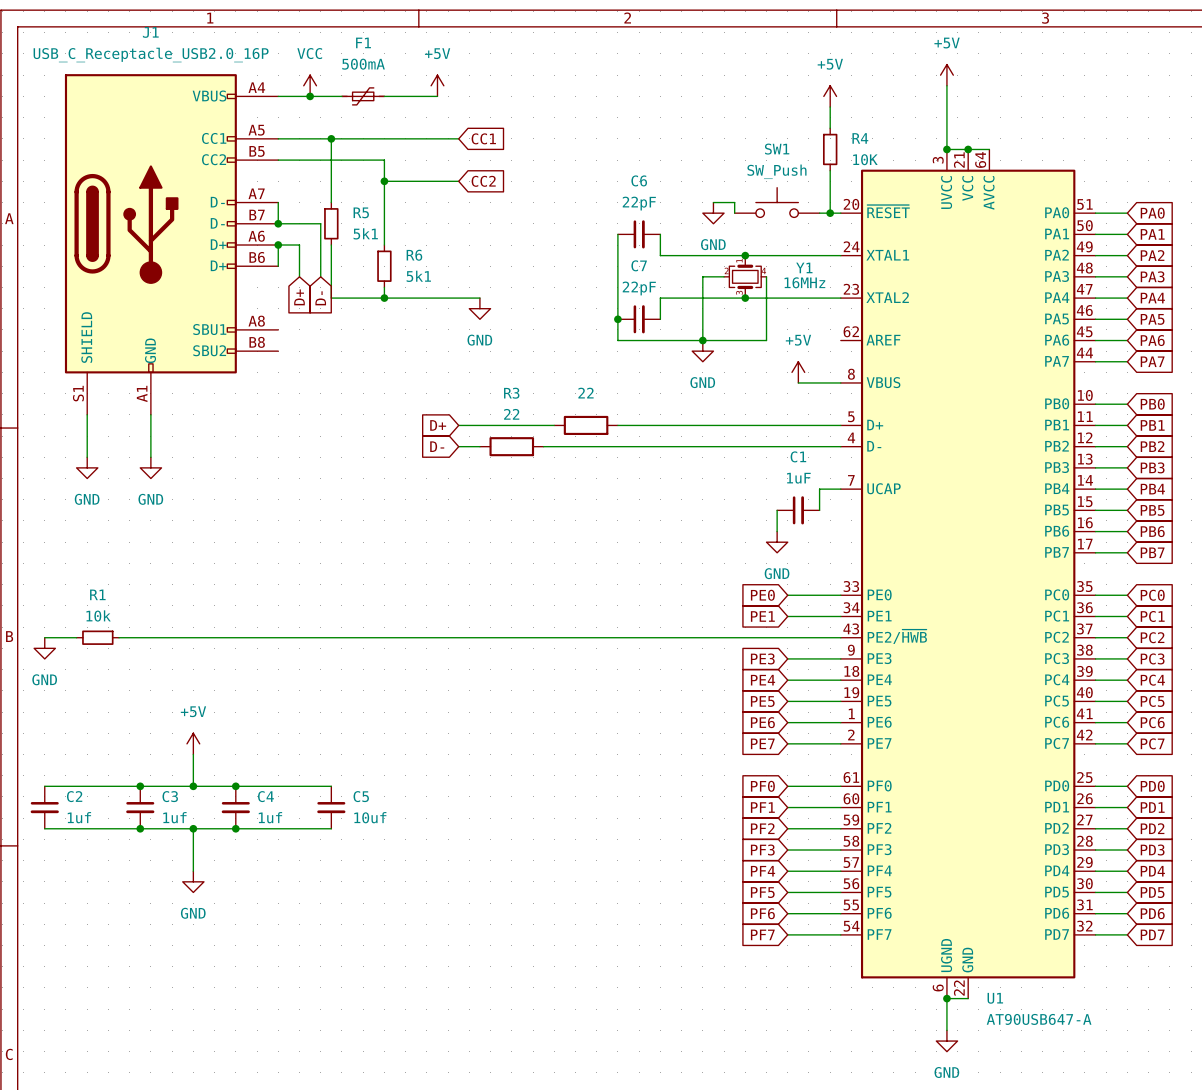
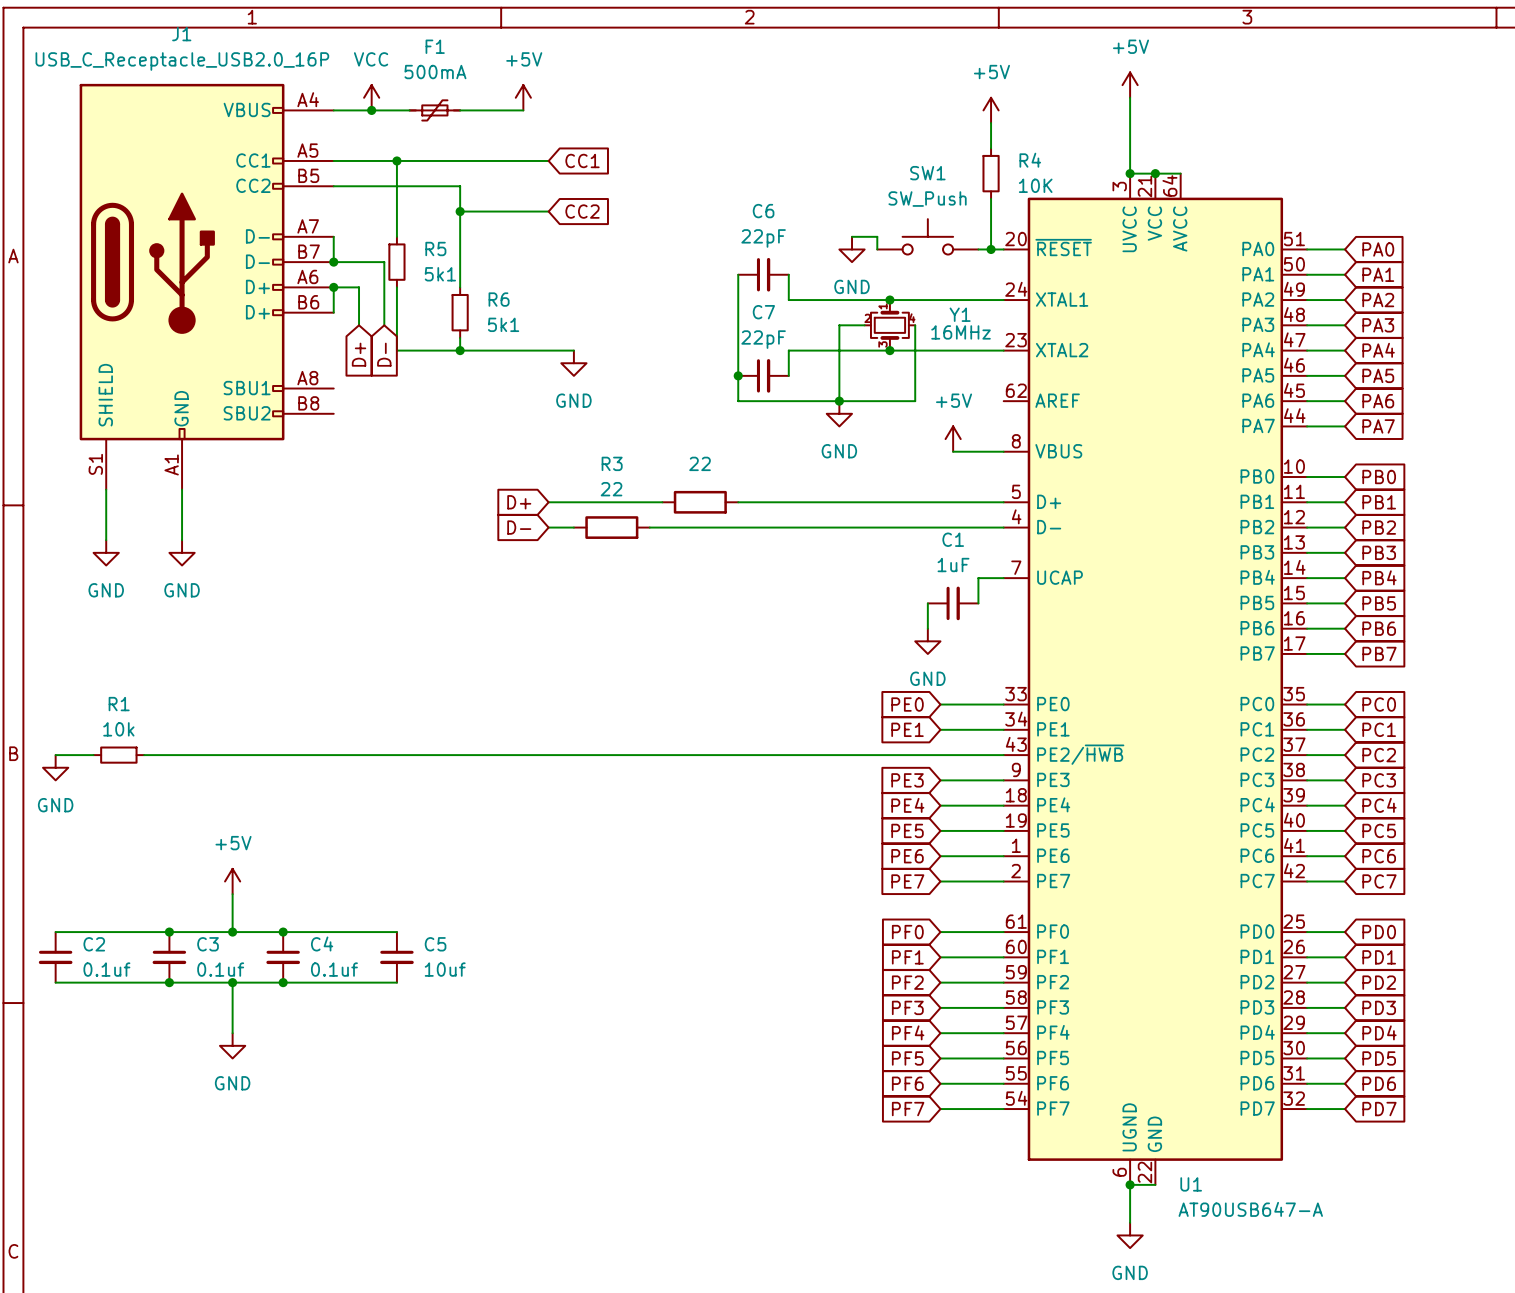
C2 value: 1uf (79, 817) -> 0.1uf (106, 969)
C3 value: 1uf (174, 817) -> 0.1uf (220, 969)
C4 value: 1uf (270, 817) -> 0.1uf (334, 969)

